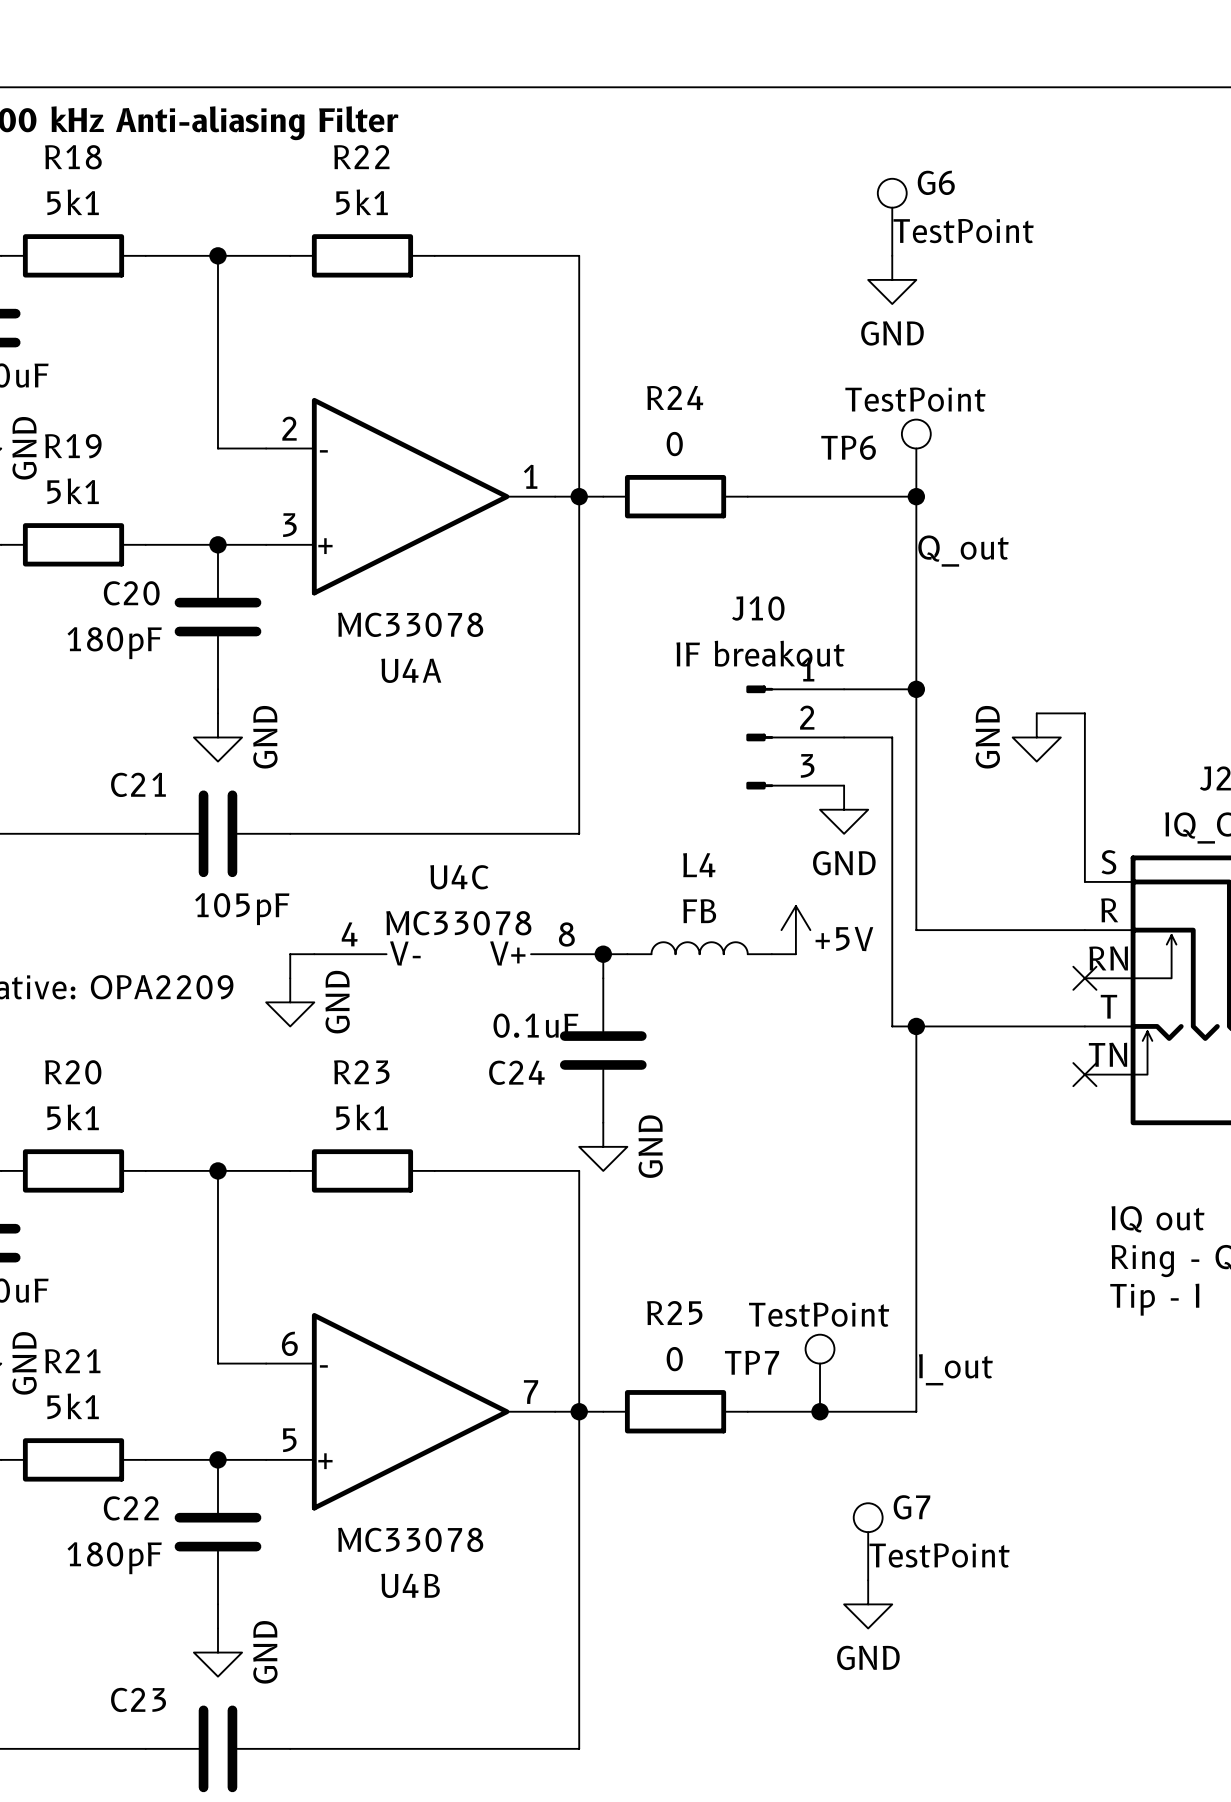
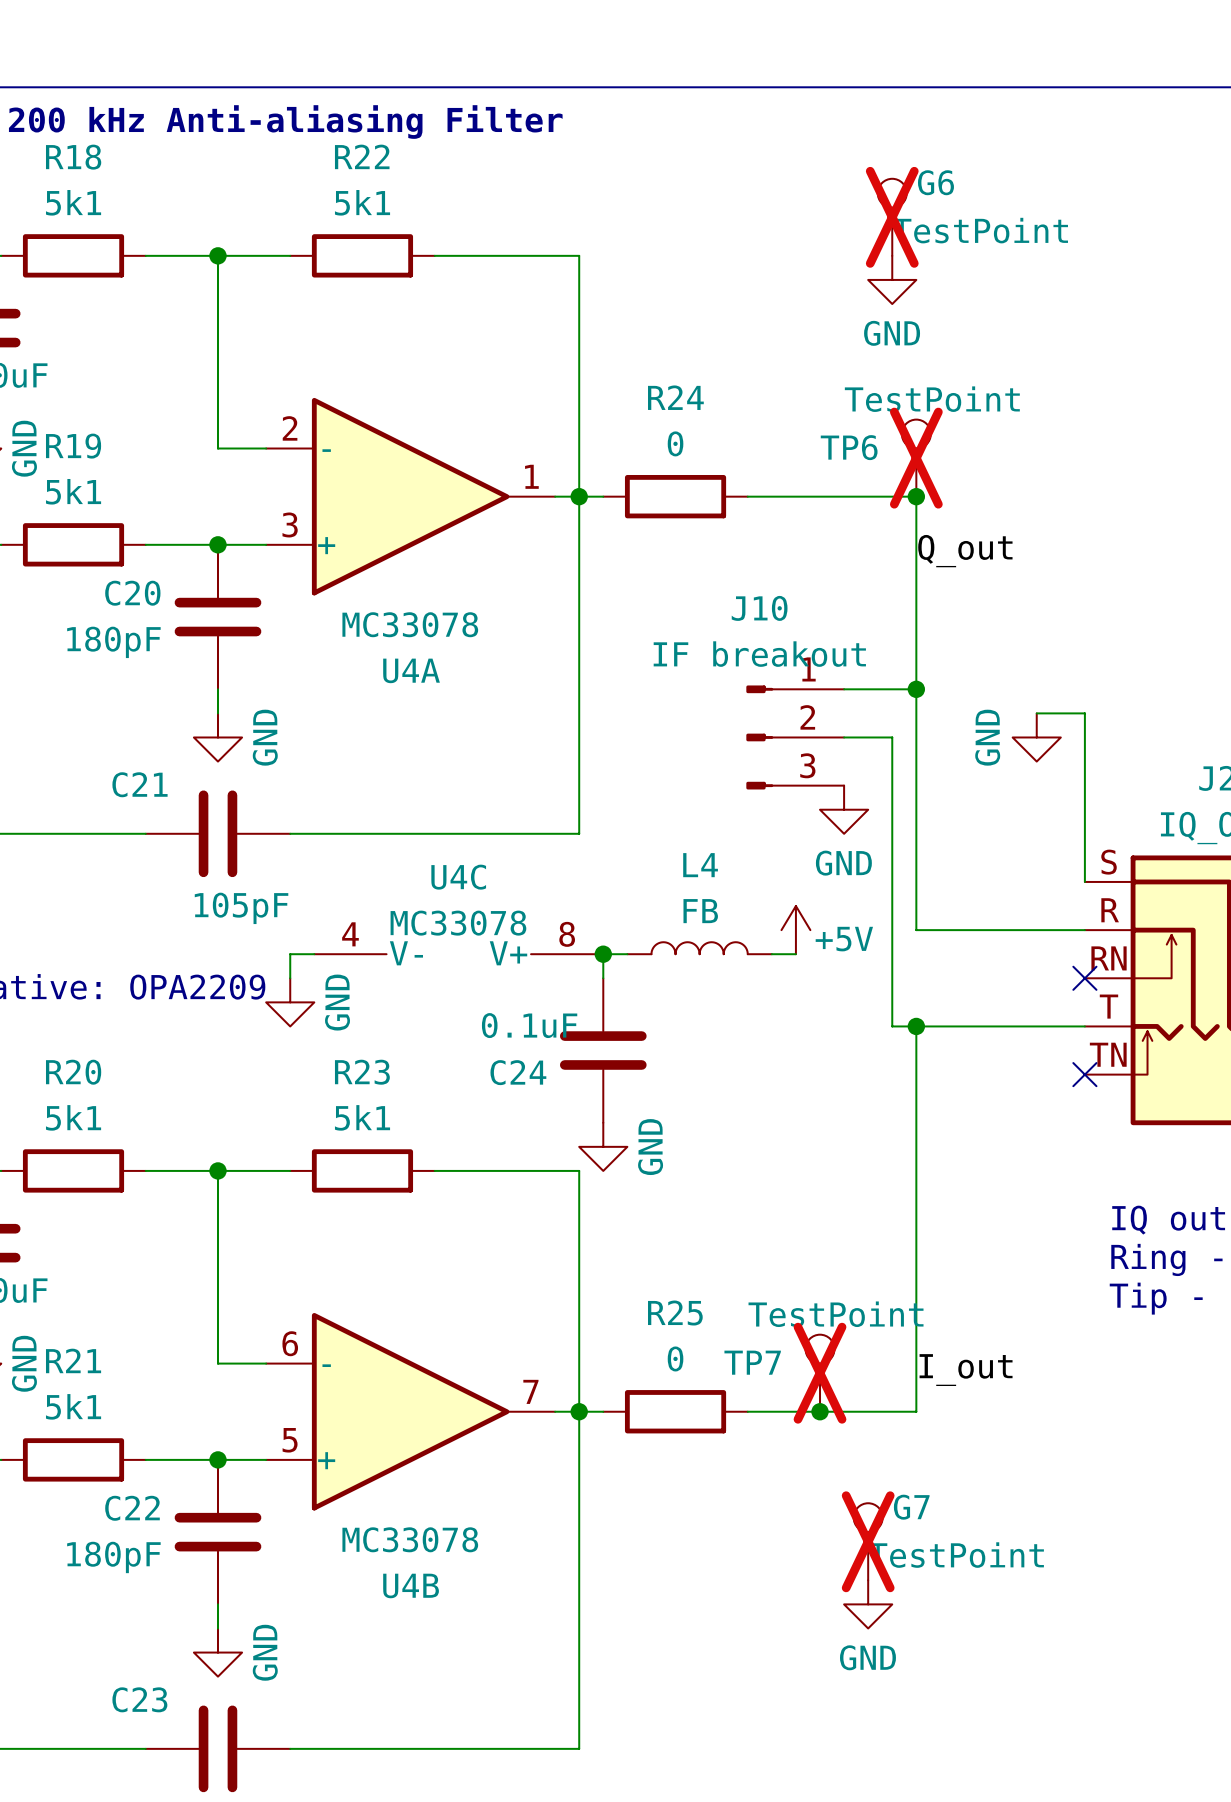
G6 do-not-place cross: none -> (892, 217)
TP6 do-not-place cross: none -> (916, 458)
TP7 do-not-place cross: none -> (820, 1373)
G7 do-not-place cross: none -> (868, 1541)

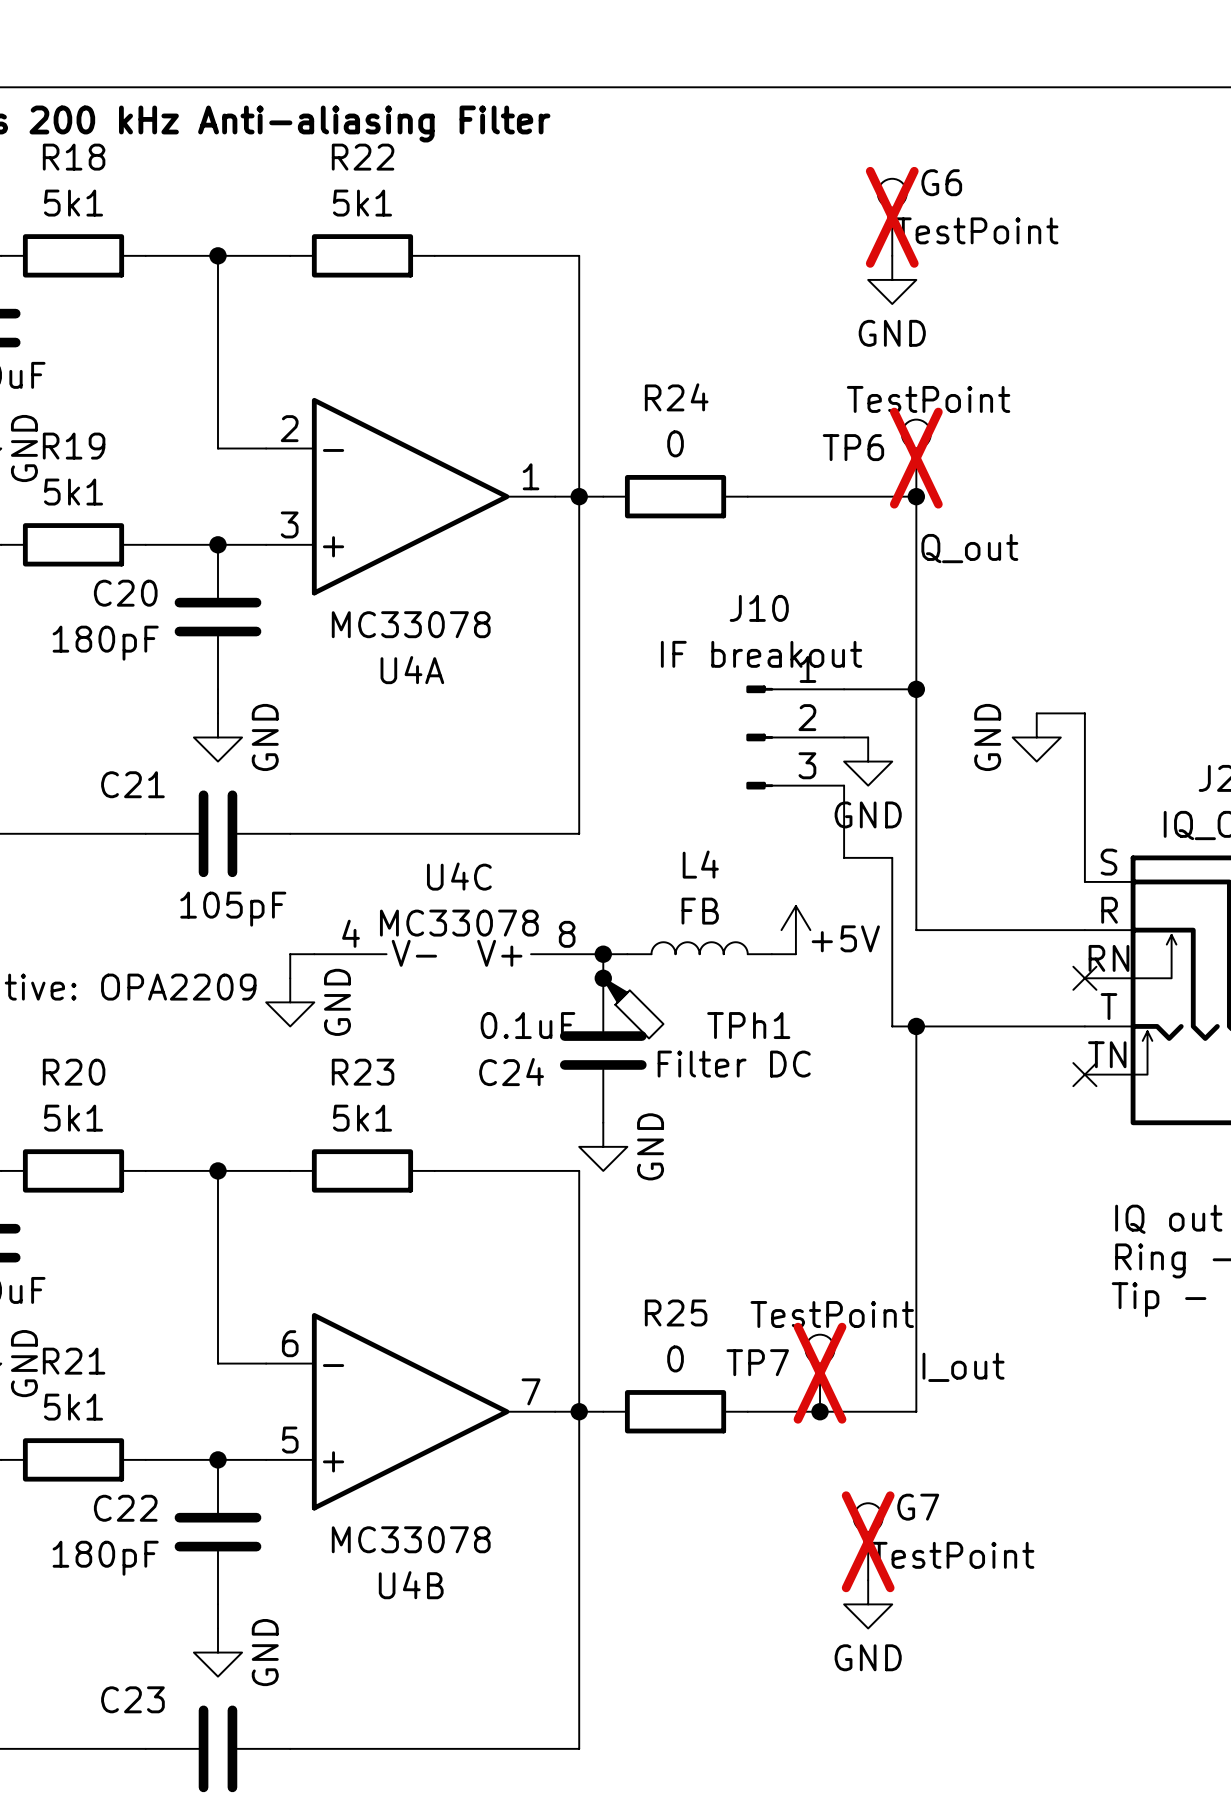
wire: (868, 737) (892, 737) (892, 857) -> (844, 785) (844, 857) (892, 857)
power symbol position: GND (844, 809) -> GND (868, 761)
junction: none -> (603, 978)
TPh1: none -> Filter DC (633, 1008)

